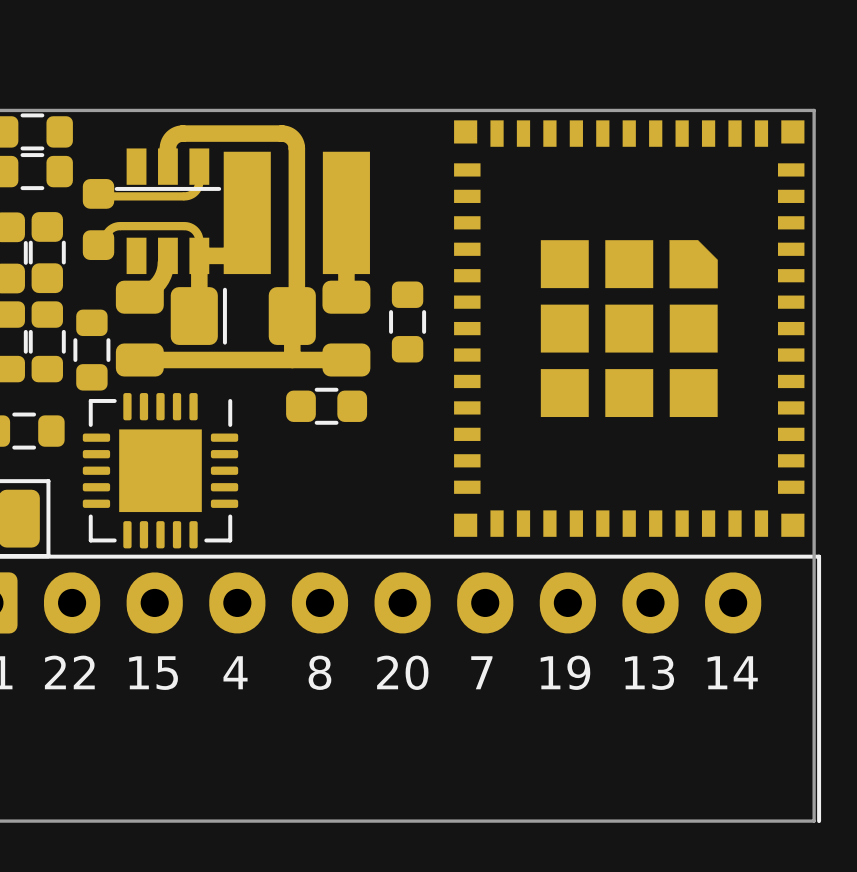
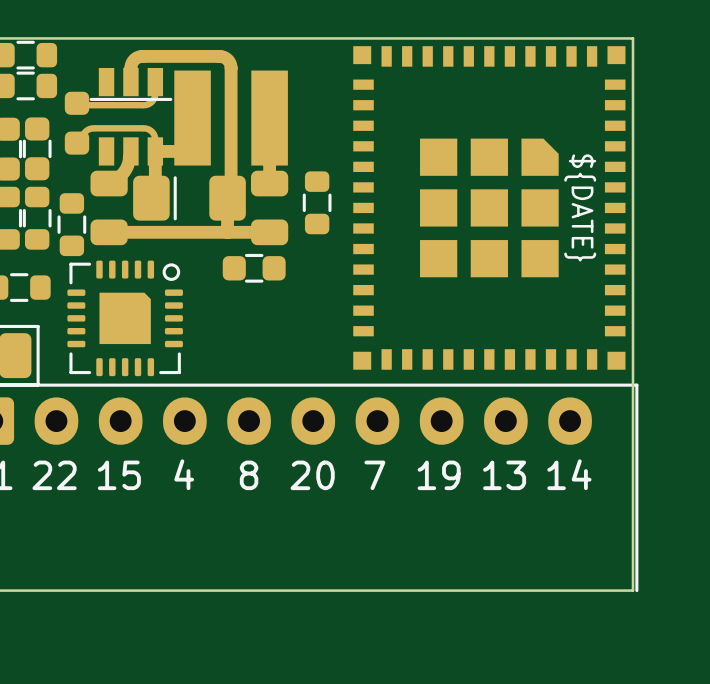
part footprint: [454, 120, 805, 537] -> [353, 46, 626, 370]
part footprint: [82, 393, 239, 549] -> [67, 260, 183, 377]

